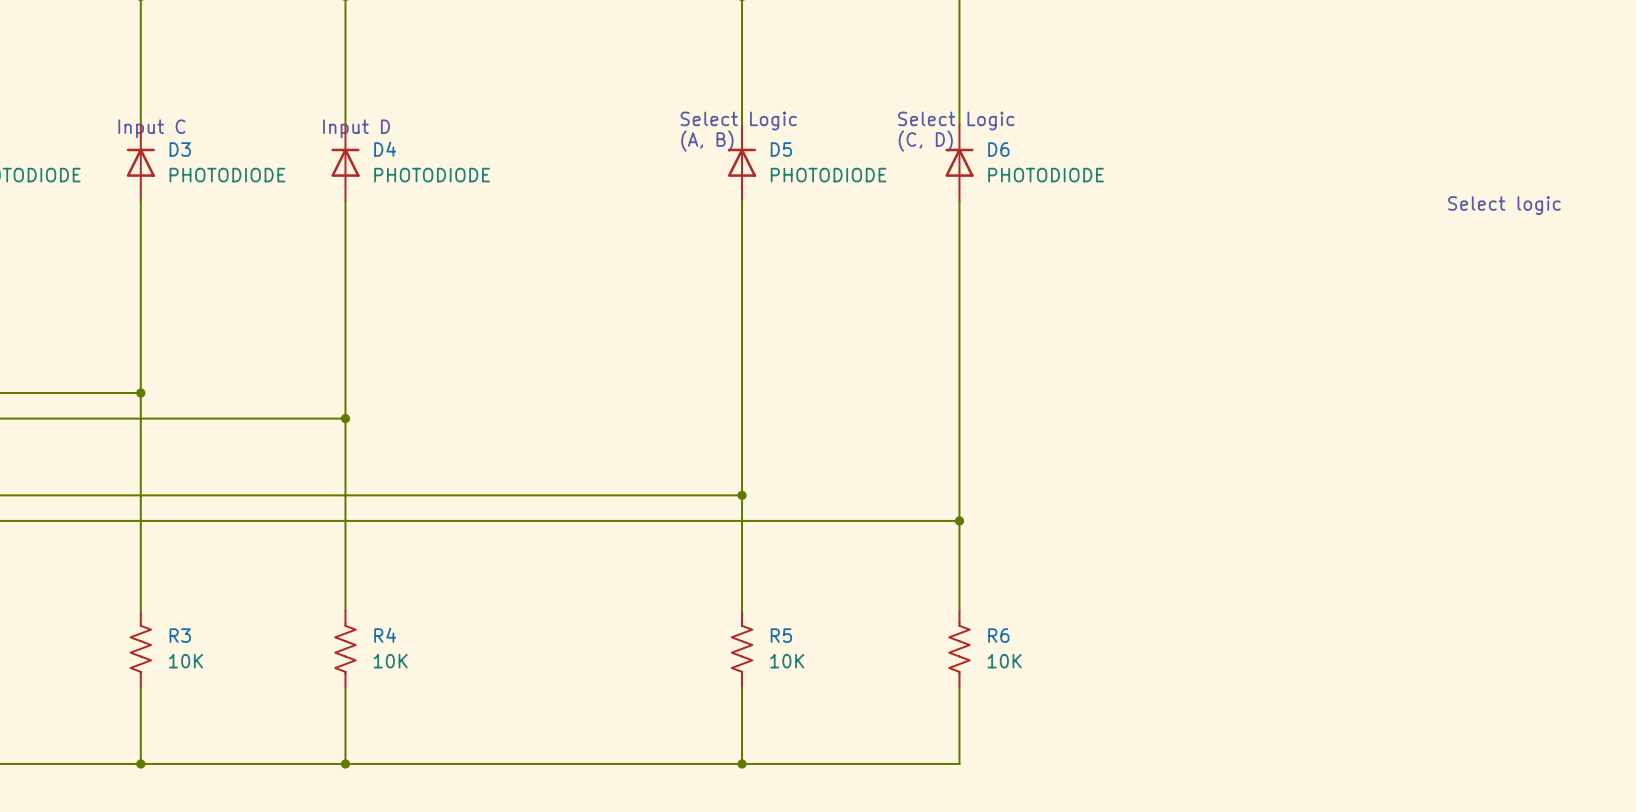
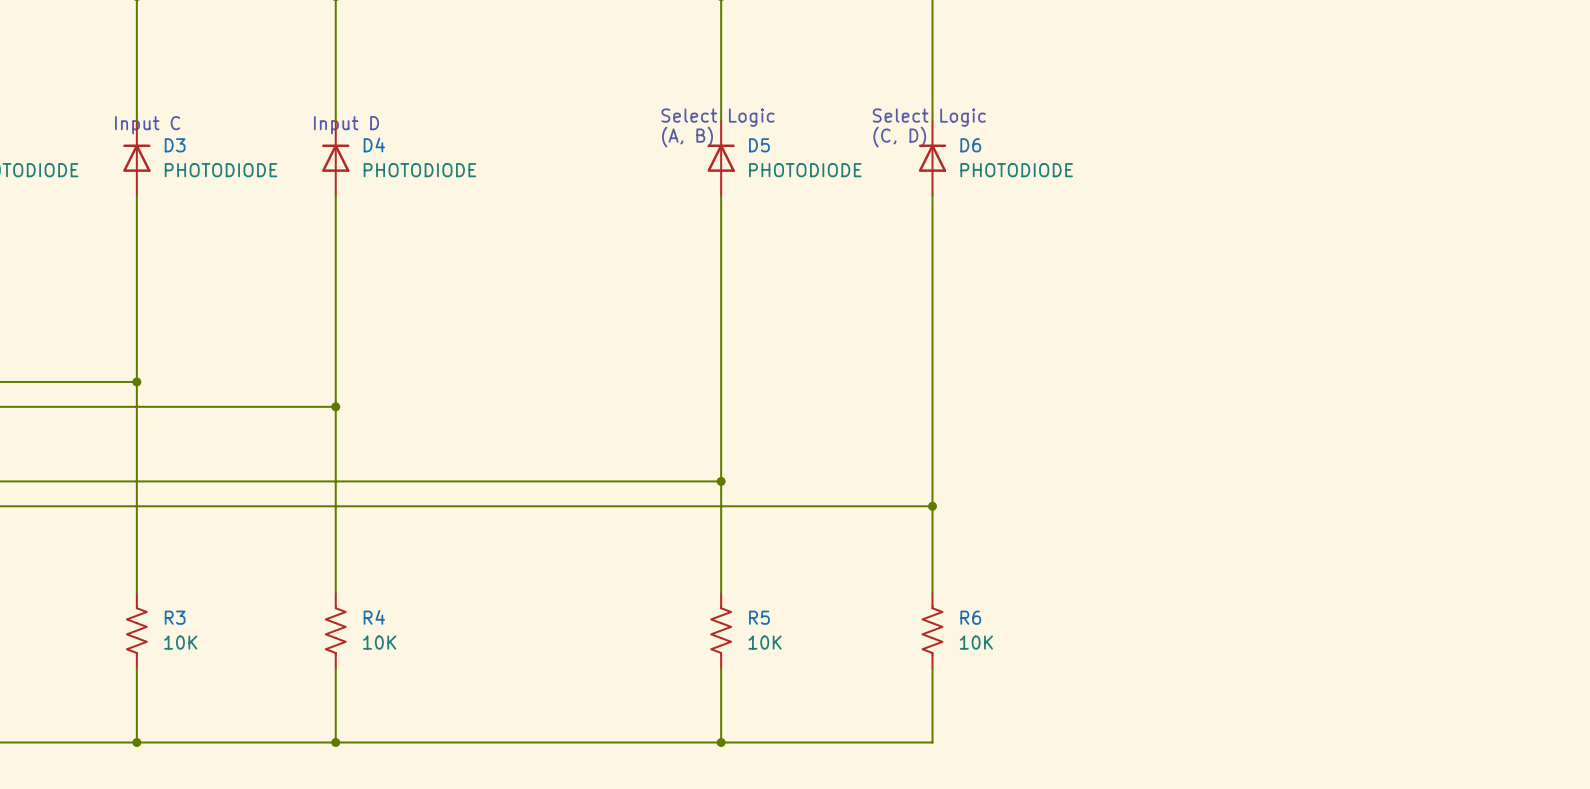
text: Select logic (1504, 205) -> none

